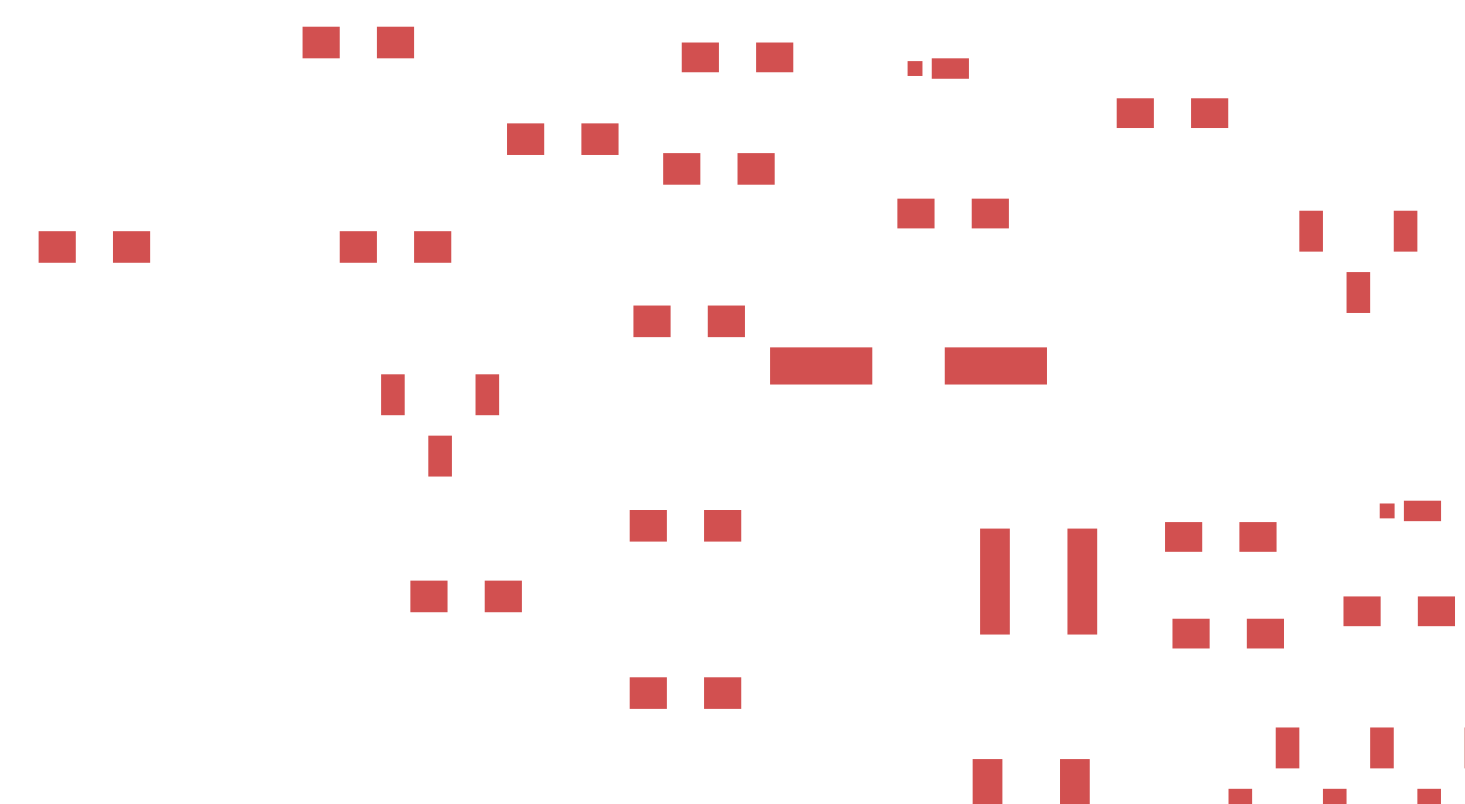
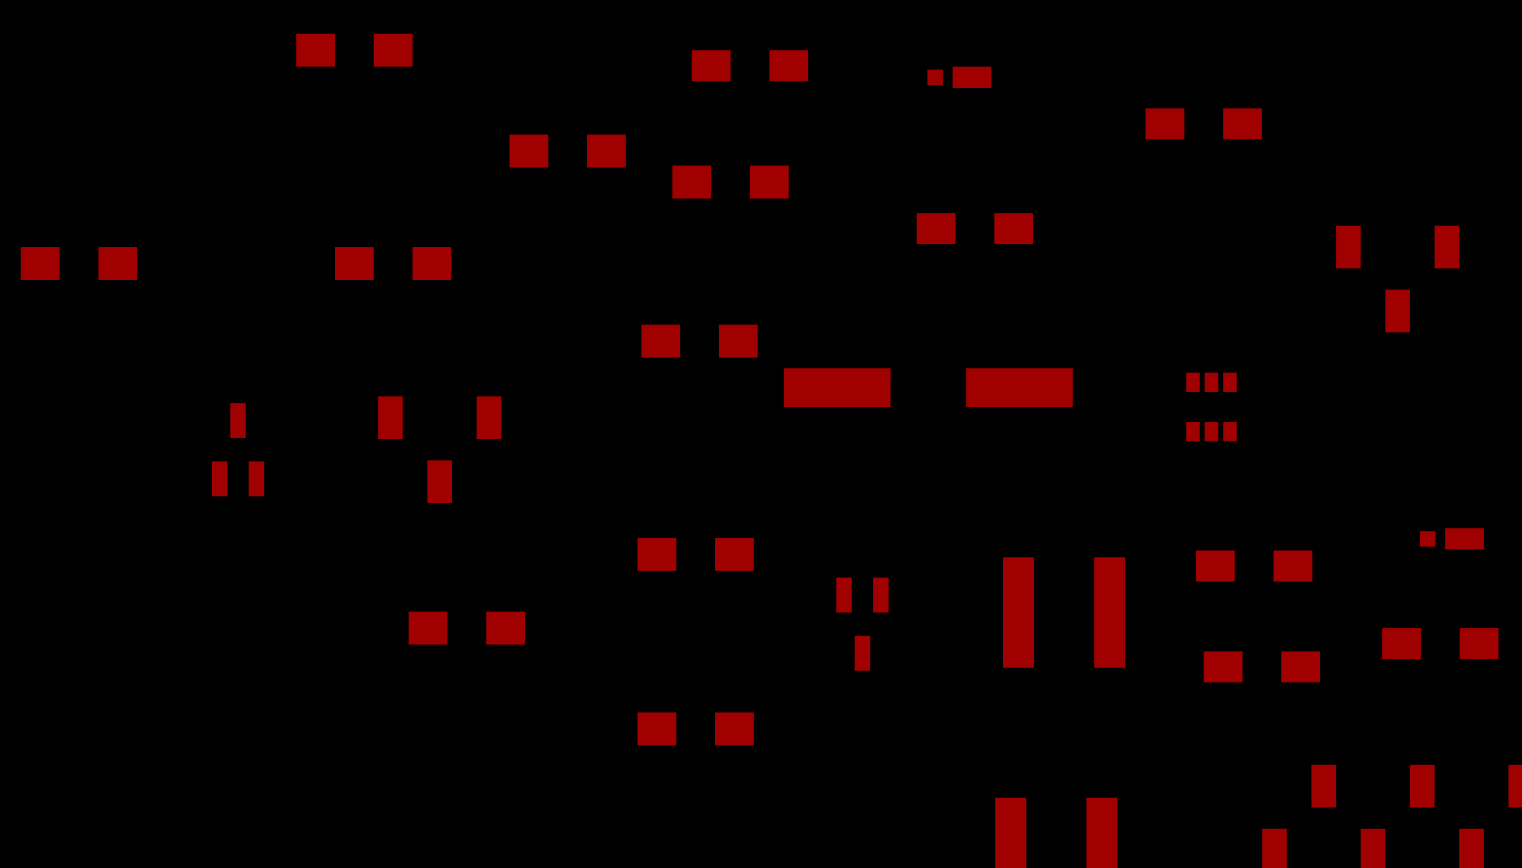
part: none -> (1211, 407)
part: none -> (238, 449)
part: none -> (862, 624)

